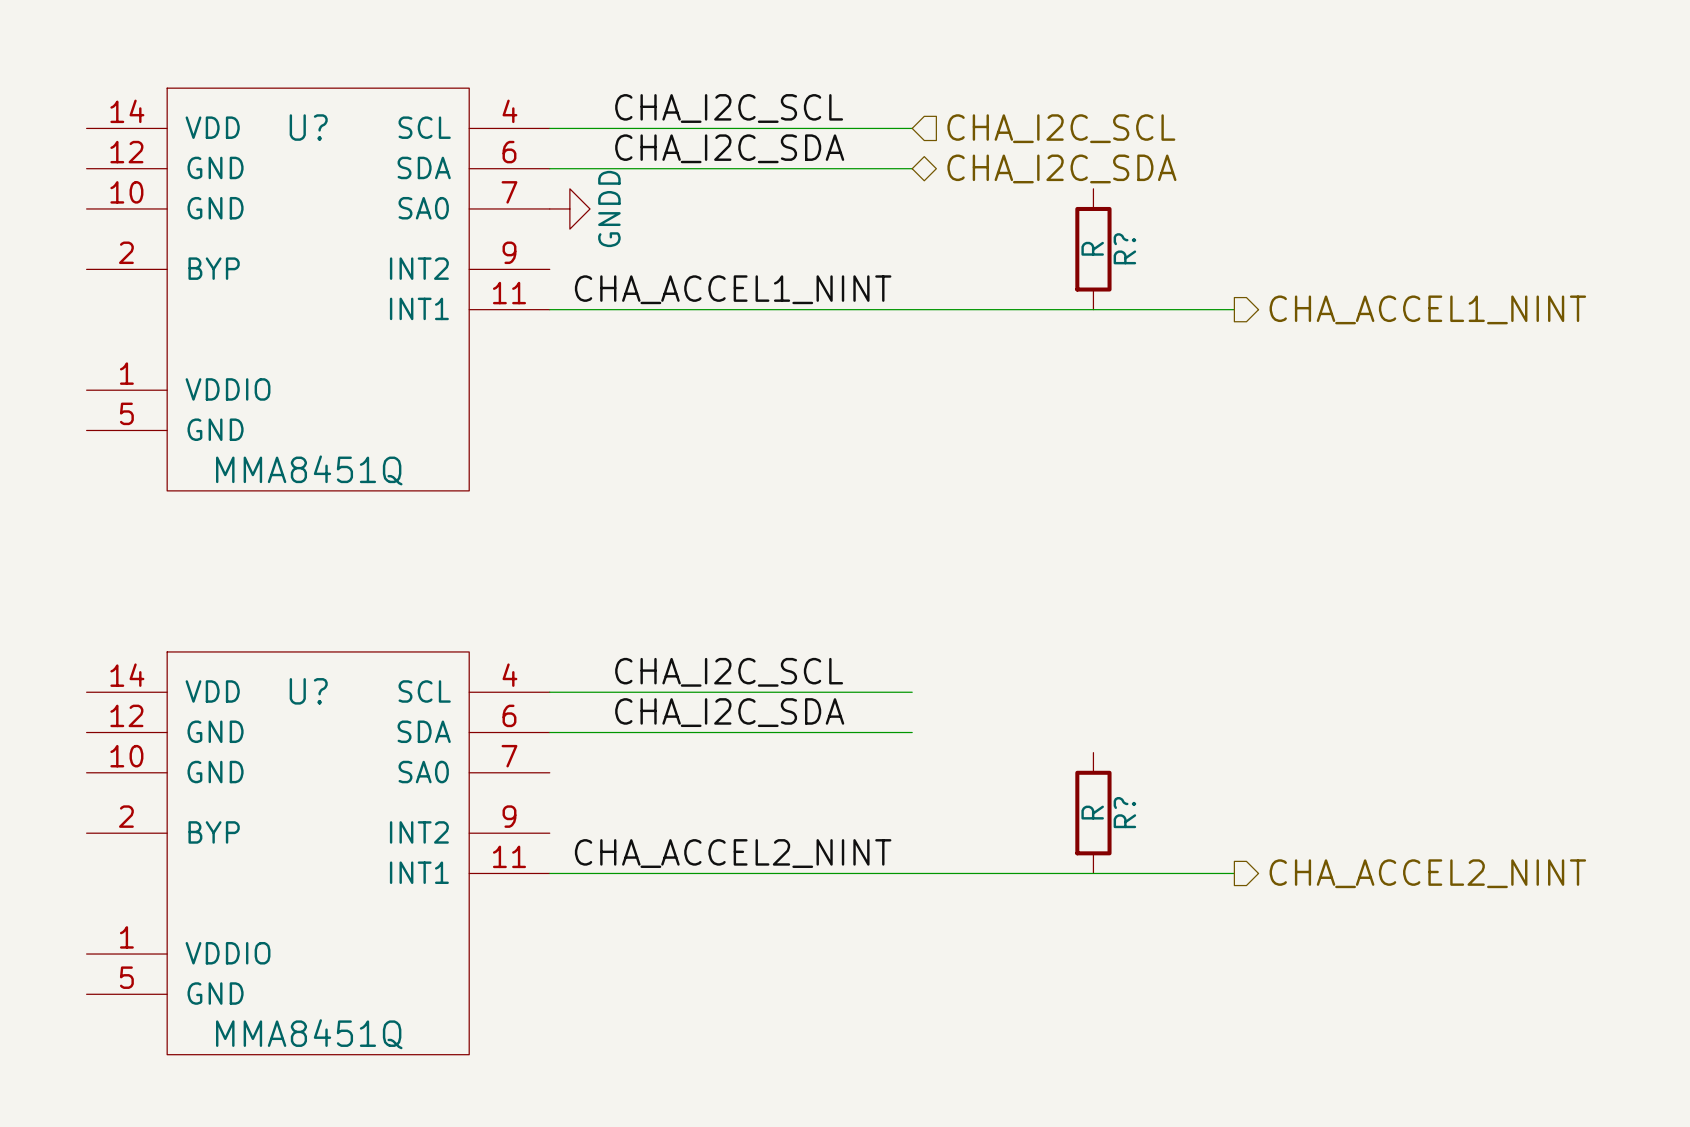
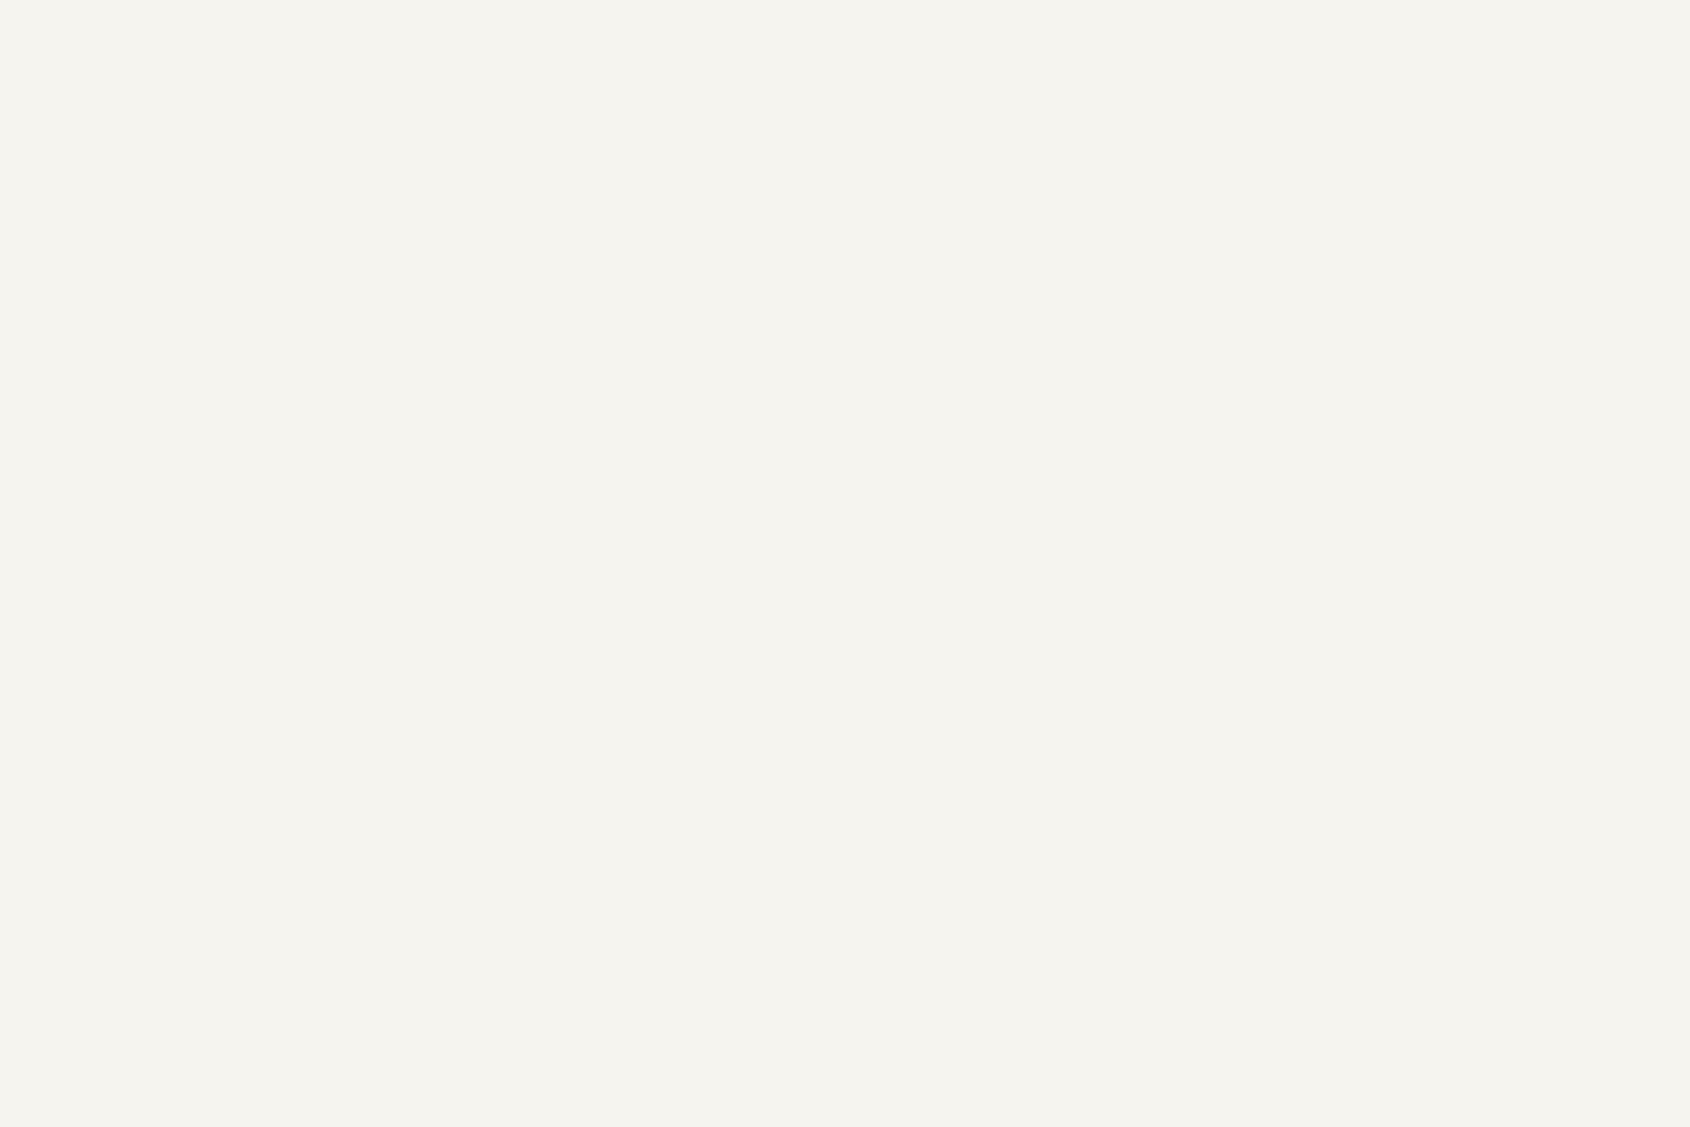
label: CHA_I2C_SCL (729, 108) -> none
wire: (549, 128) (912, 128) -> none
hierarchical label: CHA_I2C_SCL (1061, 128) -> none
label: CHA_I2C_SDA (729, 148) -> none
wire: (549, 168) (912, 168) -> none
hierarchical label: CHA_I2C_SDA (1061, 168) -> none
power symbol: GNDD (569, 208) -> none
R?: R (1093, 249) -> none
U?: MMA8451Q (318, 289) -> none
label: CHA_ACCEL1_NINT (733, 289) -> none
wire: (549, 309) (1234, 309) -> none
hierarchical label: CHA_ACCEL1_NINT (1427, 309) -> none
label: CHA_I2C_SCL (729, 672) -> none
wire: (549, 692) (912, 692) -> none
label: CHA_I2C_SDA (729, 712) -> none
wire: (549, 732) (912, 732) -> none
R?: R (1093, 813) -> none
U?: MMA8451Q (318, 853) -> none
label: CHA_ACCEL2_NINT (733, 853) -> none
wire: (549, 873) (1234, 873) -> none
hierarchical label: CHA_ACCEL2_NINT (1427, 873) -> none

